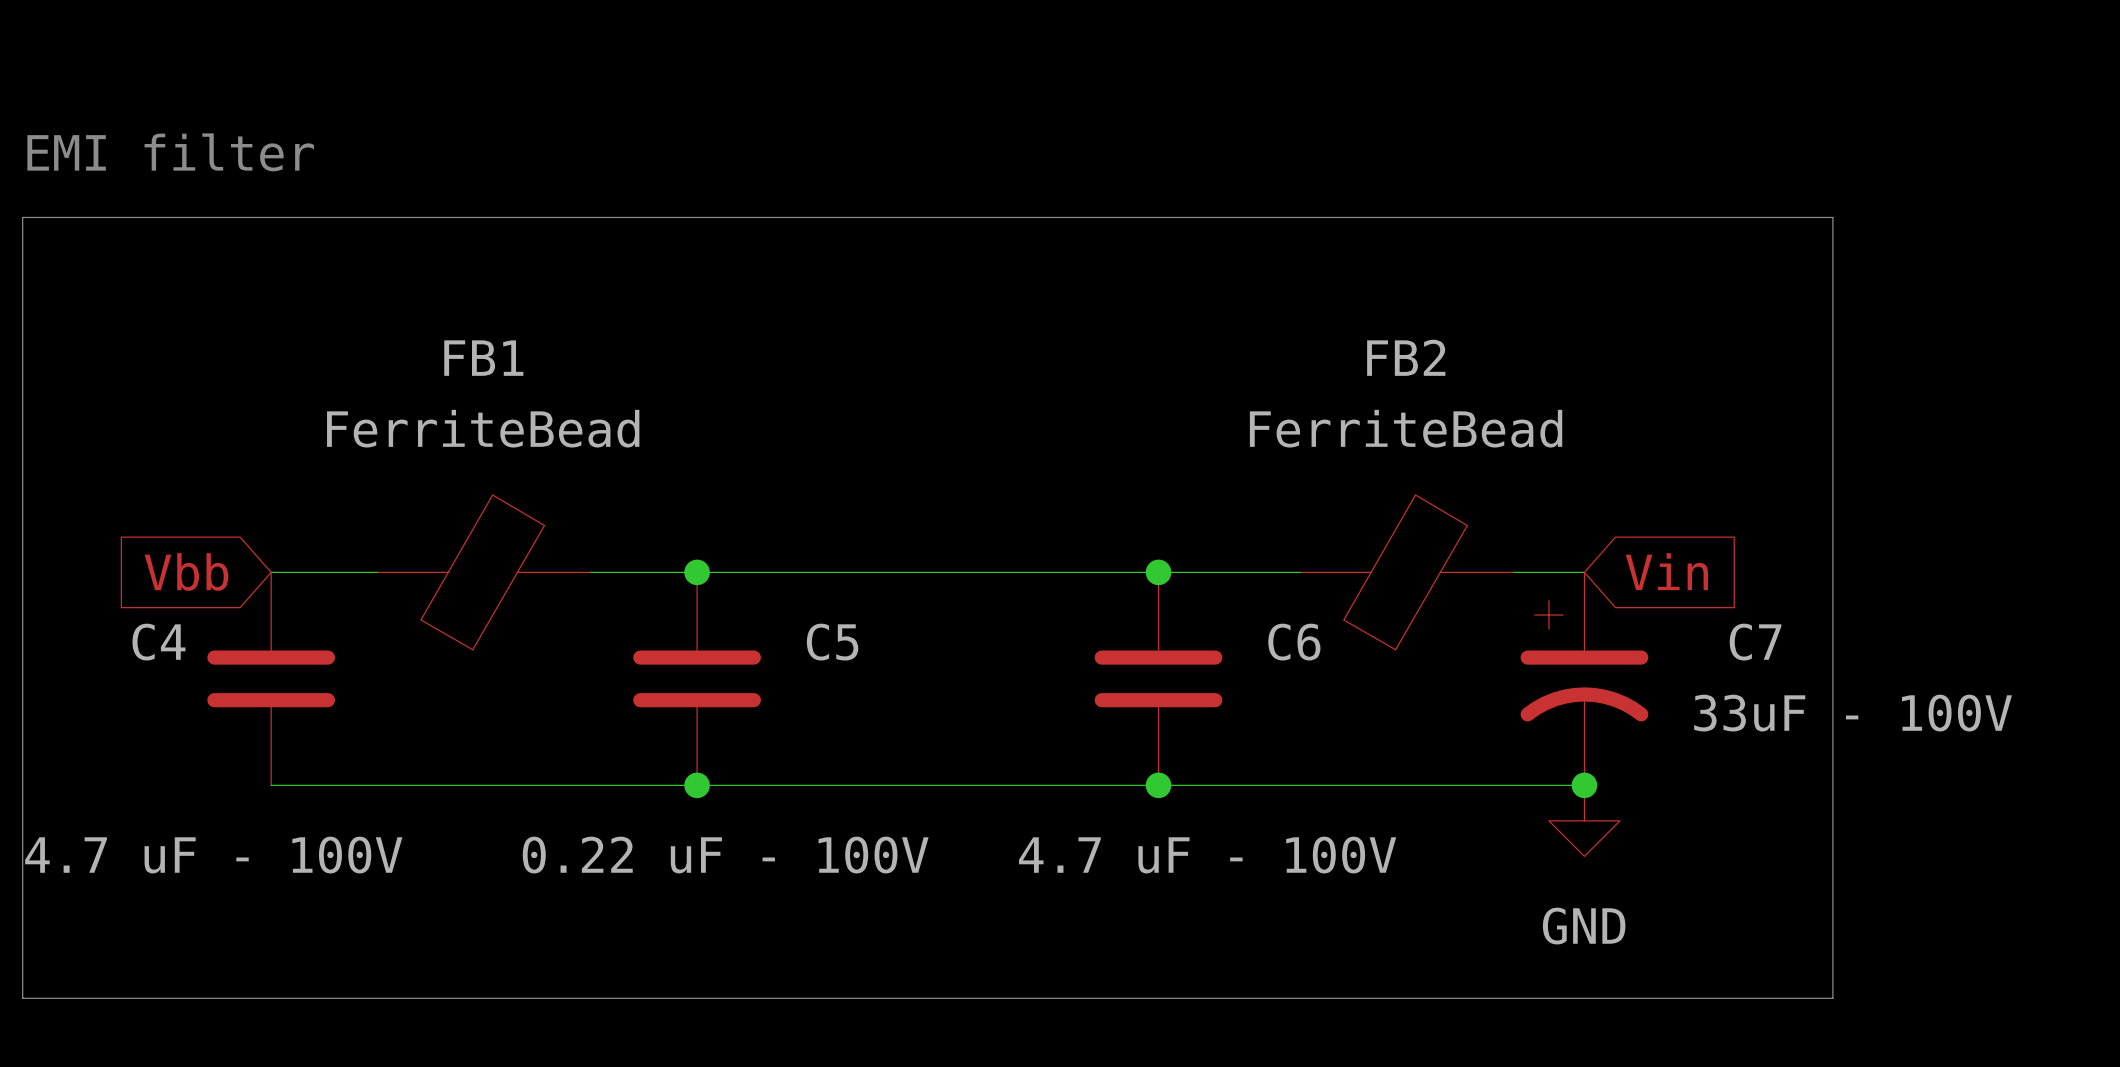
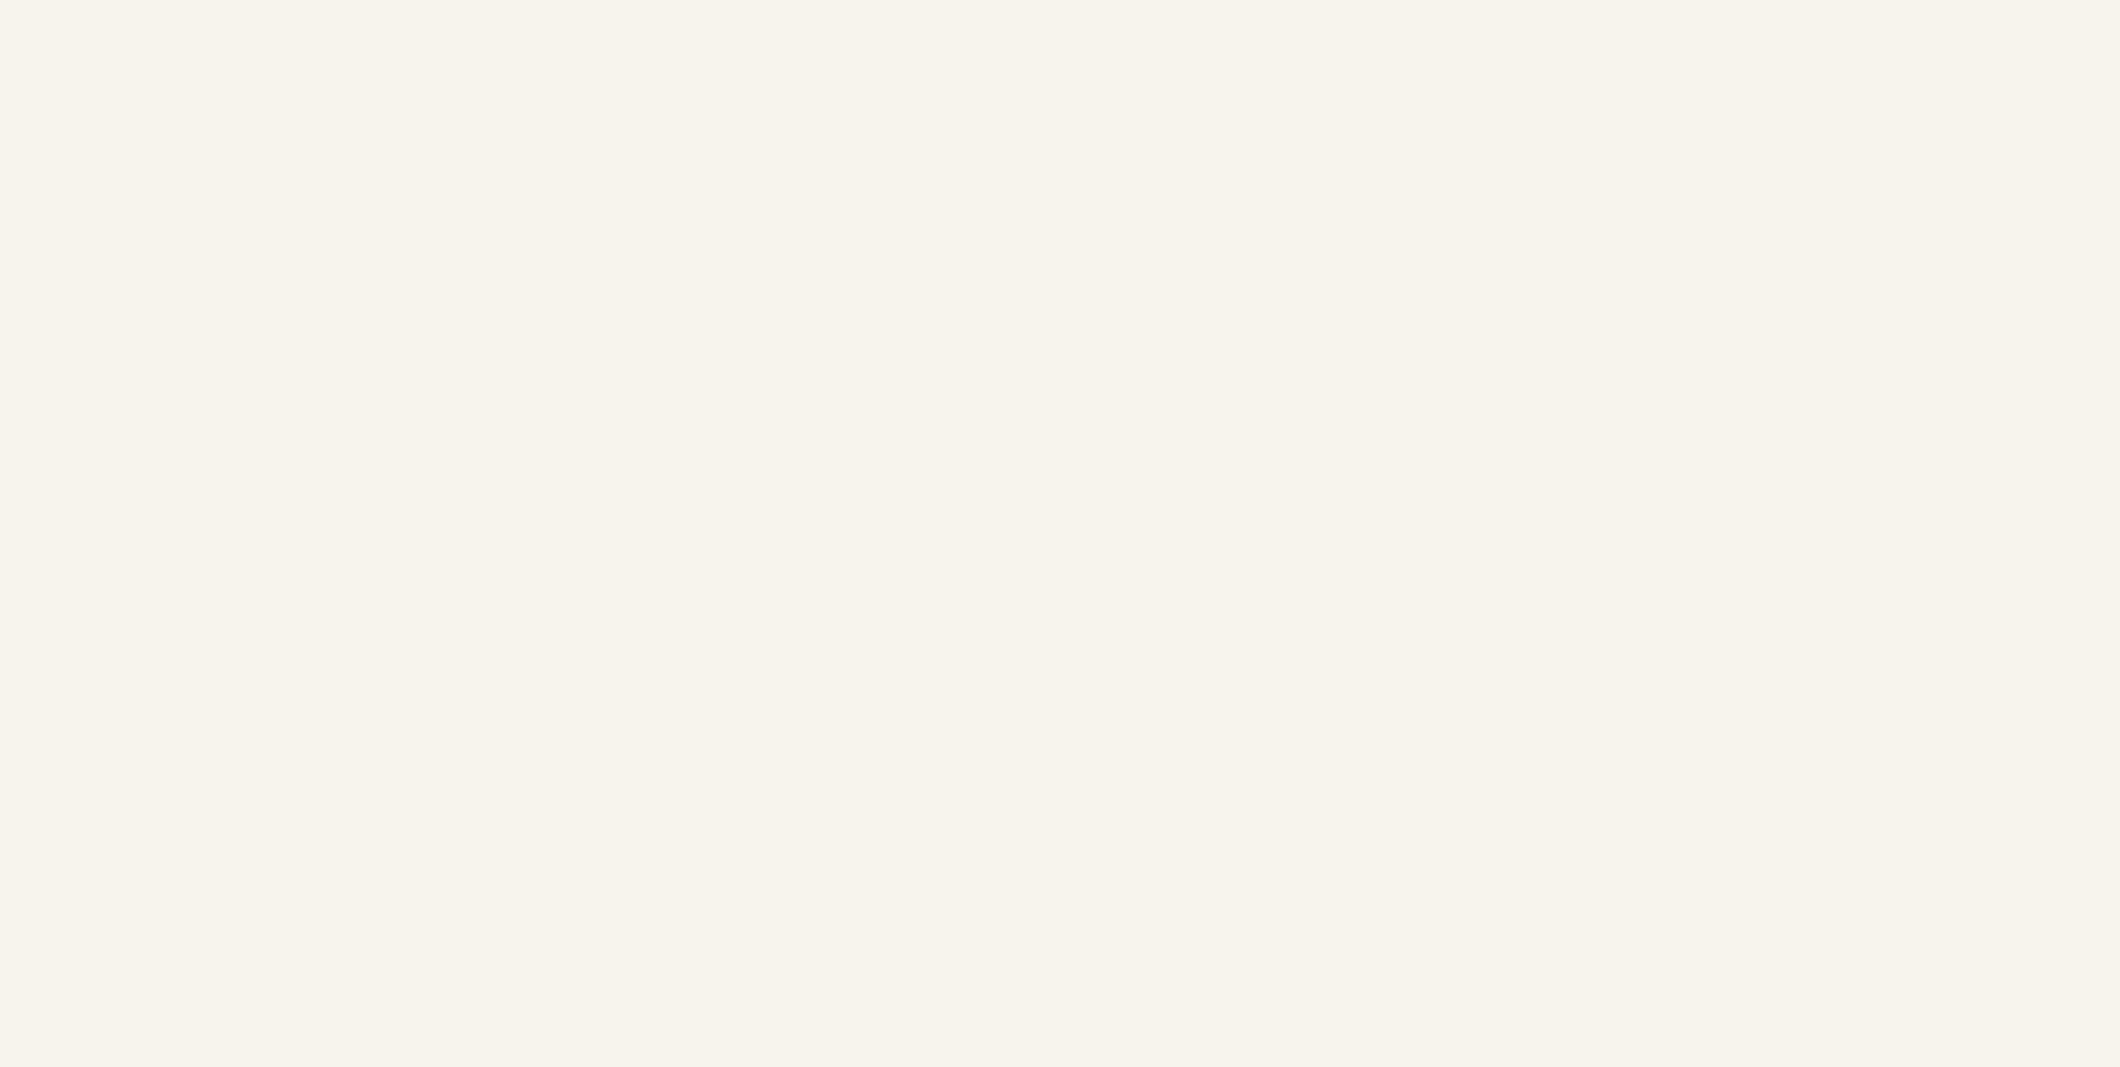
text: EMI filter (170, 152) -> none
line: (22, 217) (1832, 217) (1832, 998) (22, 998) (22, 217) -> none
global label: Vbb (186, 571) -> none
global label: Vin (1666, 571) -> none
wire: (271, 572) (377, 572) -> none
FB1: FerriteBead (484, 572) -> none
wire: (590, 572) (1300, 572) -> none
junction: (697, 572) -> none
junction: (1158, 572) -> none
FB2: FerriteBead (1406, 572) -> none
wire: (1513, 572) (1584, 572) -> none
C4: 4.7 uF - 100V (271, 678) -> none
C5: 0.22 uF - 100V (697, 678) -> none
C6: 4.7 uF - 100V (1158, 678) -> none
C7: 33uF - 100V (1584, 678) -> none
wire: (271, 785) (1584, 785) -> none
junction: (697, 785) -> none
junction: (1158, 785) -> none
junction: (1584, 785) -> none
power symbol: GND (1584, 820) -> none

